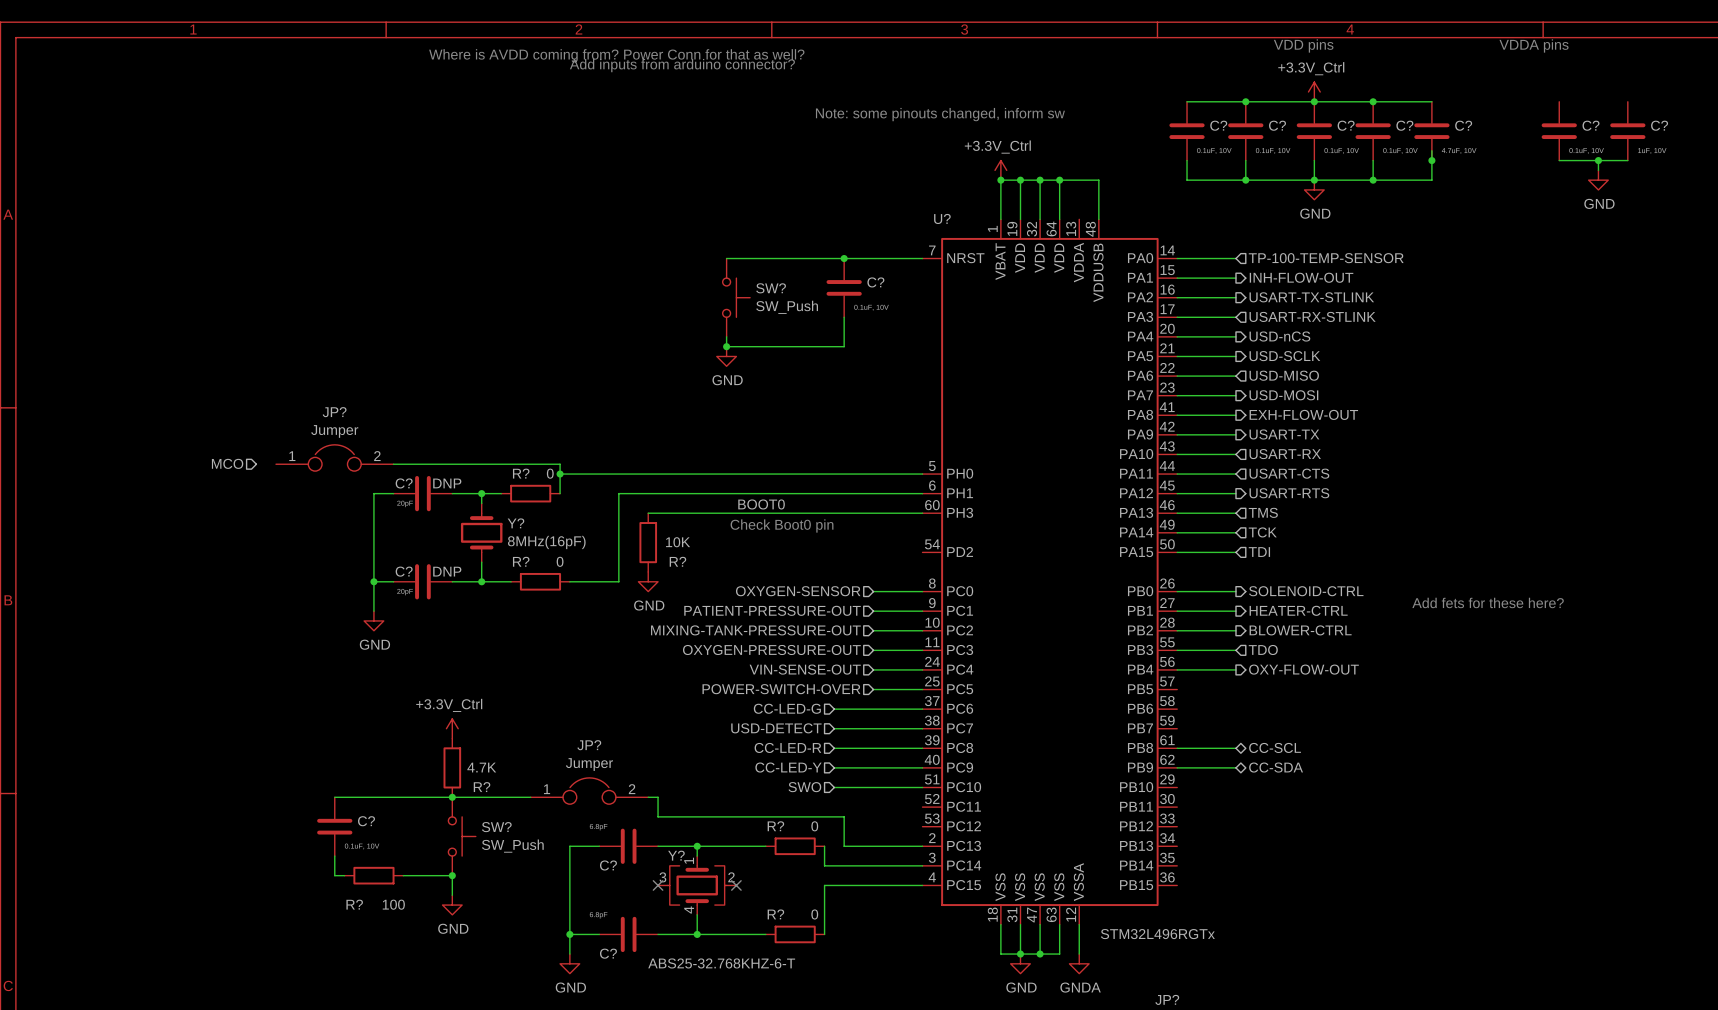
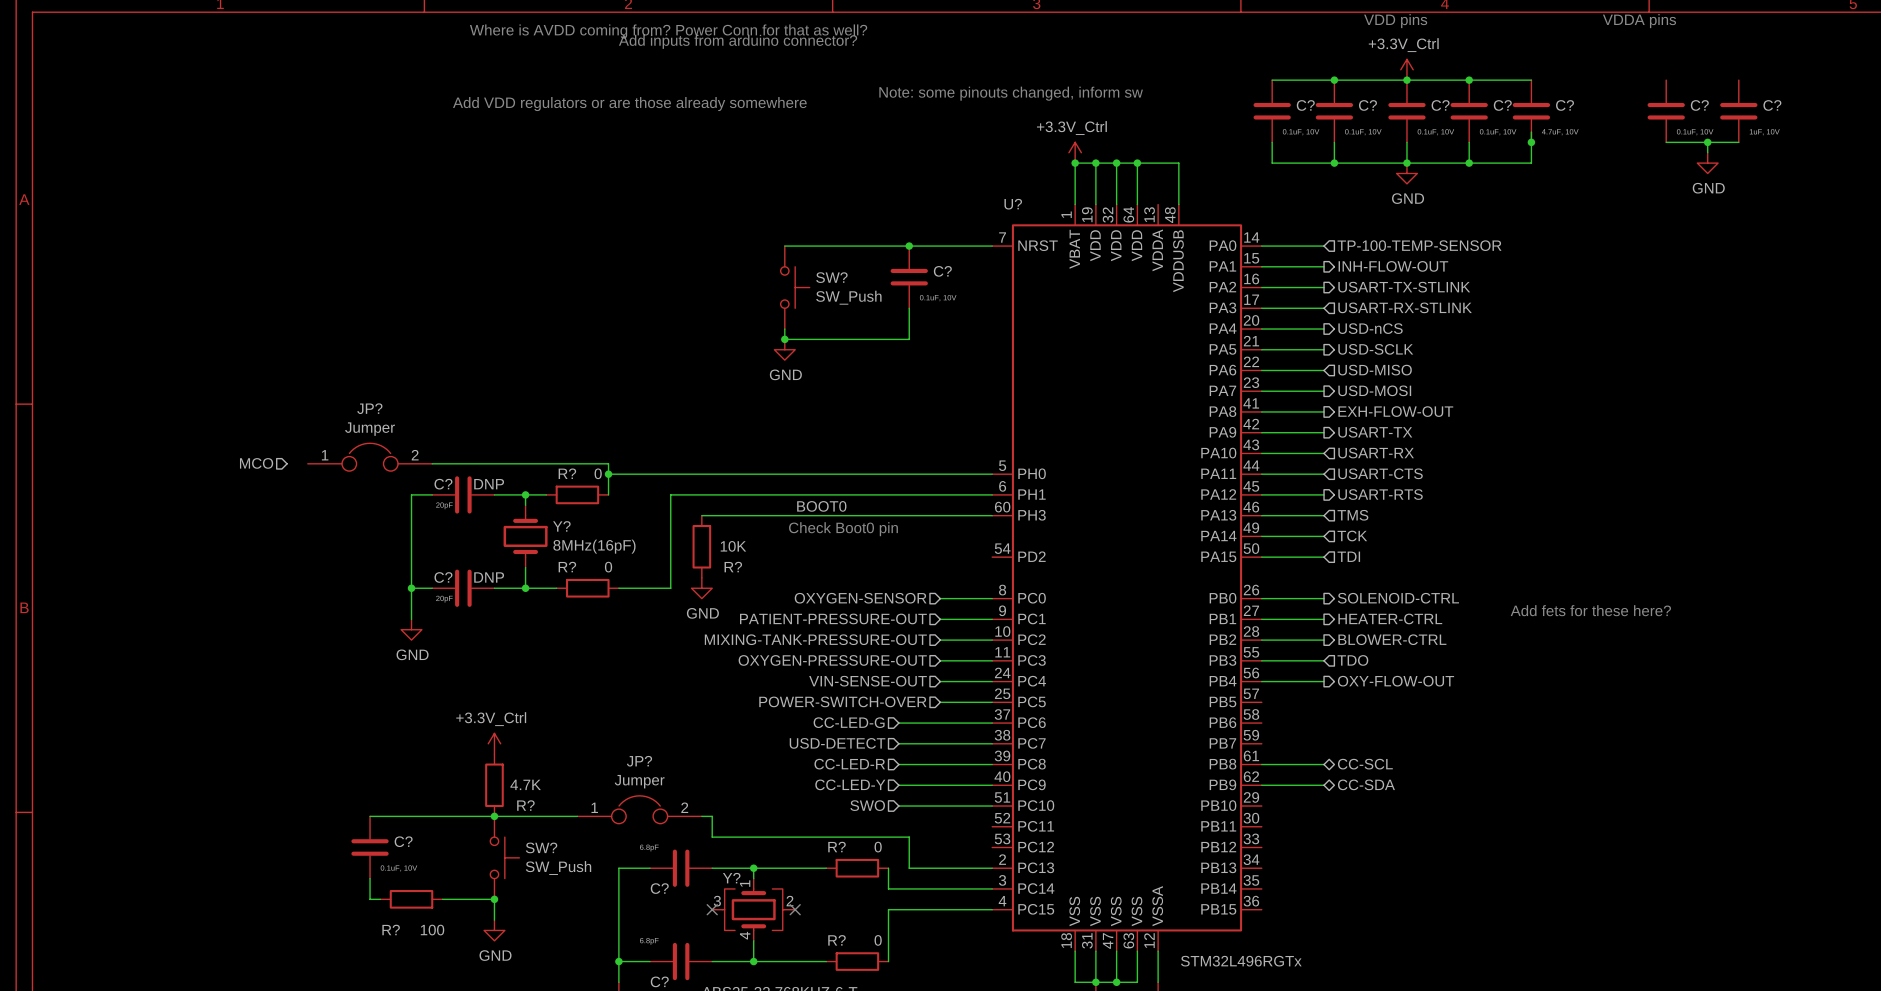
text: none -> Add VDD regulators or are those already somewhere (629, 104)

